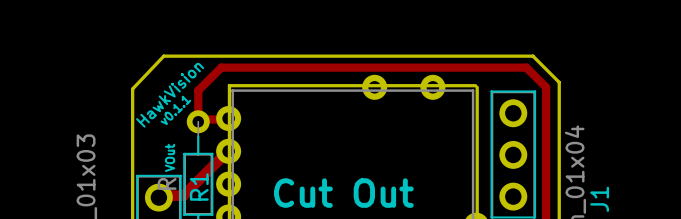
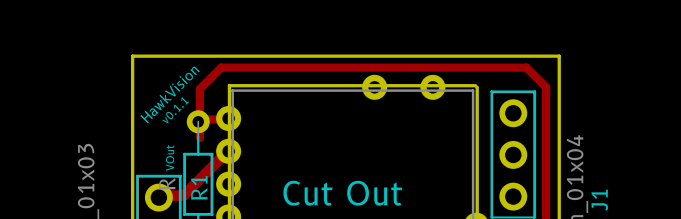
board edge: (163, 56) (132, 88) -> (163, 56) (132, 56) (132, 88)
board edge: (532, 56) (559, 82) -> (532, 56) (559, 56) (559, 82)
top track: (199, 88) (198, 90) (198, 121) -> (199, 88) (199, 138)

